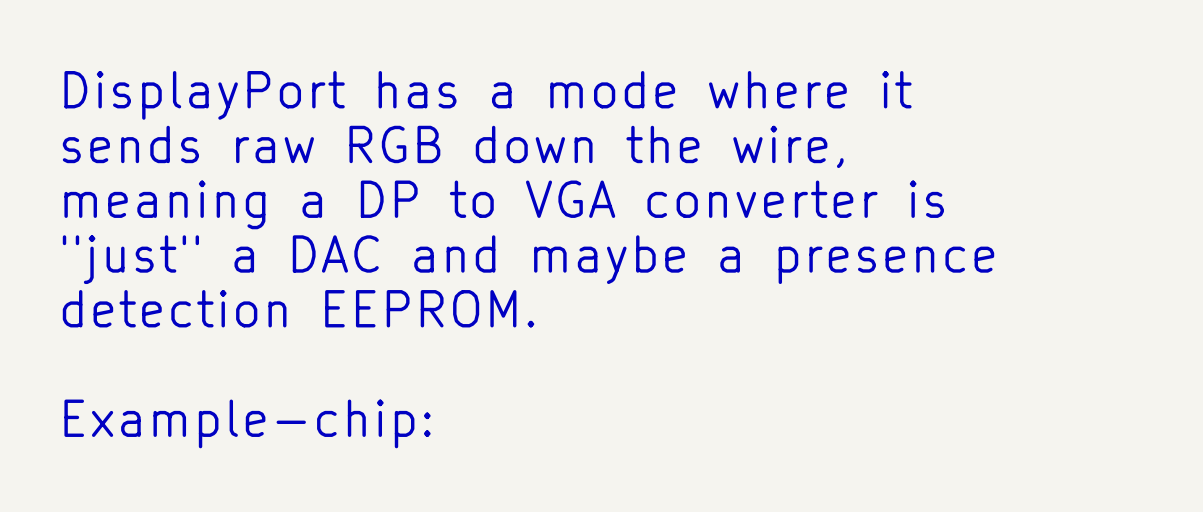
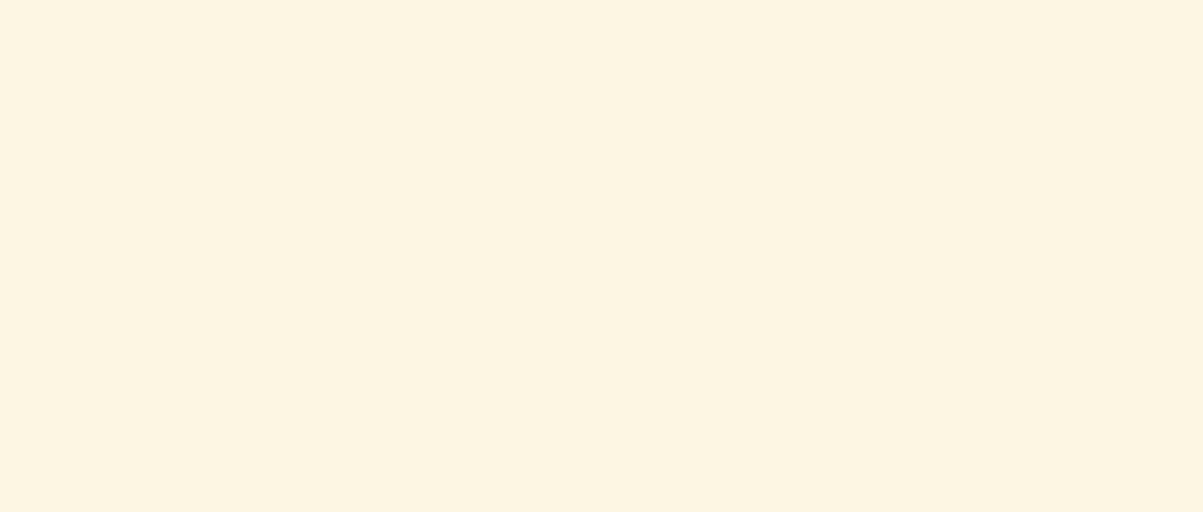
text: DisplayPort has a mode where it (488, 95) -> none
text: sends raw RGB down the wire, (453, 146) -> none
text: meaning a DP to VGA converter is (504, 204) -> none
text: "just" a DAC and maybe a presence (528, 259) -> none
text: detection EEPROM. (298, 308) -> none
text: Example-chip: (247, 423) -> none

